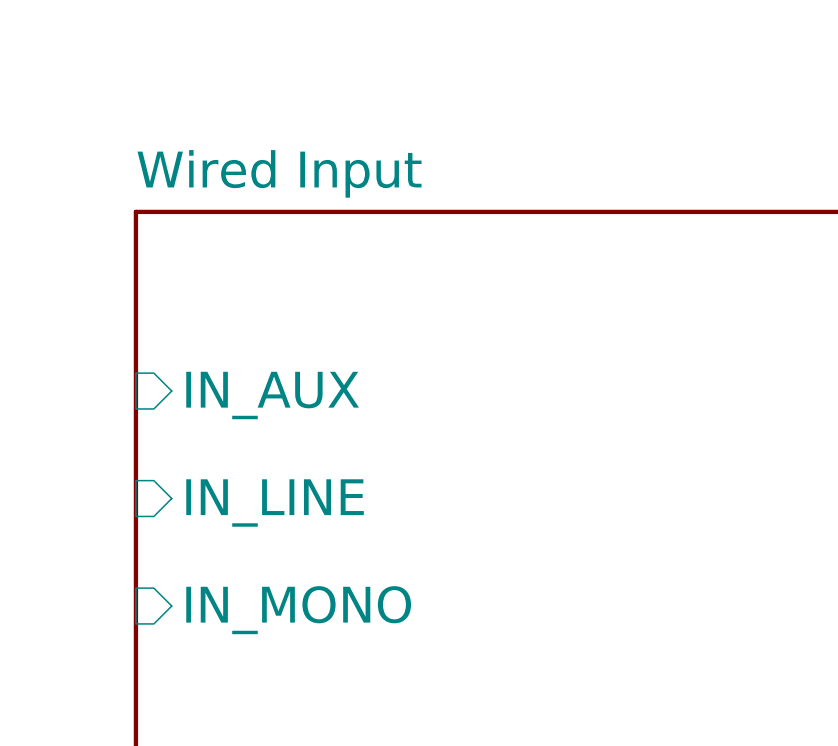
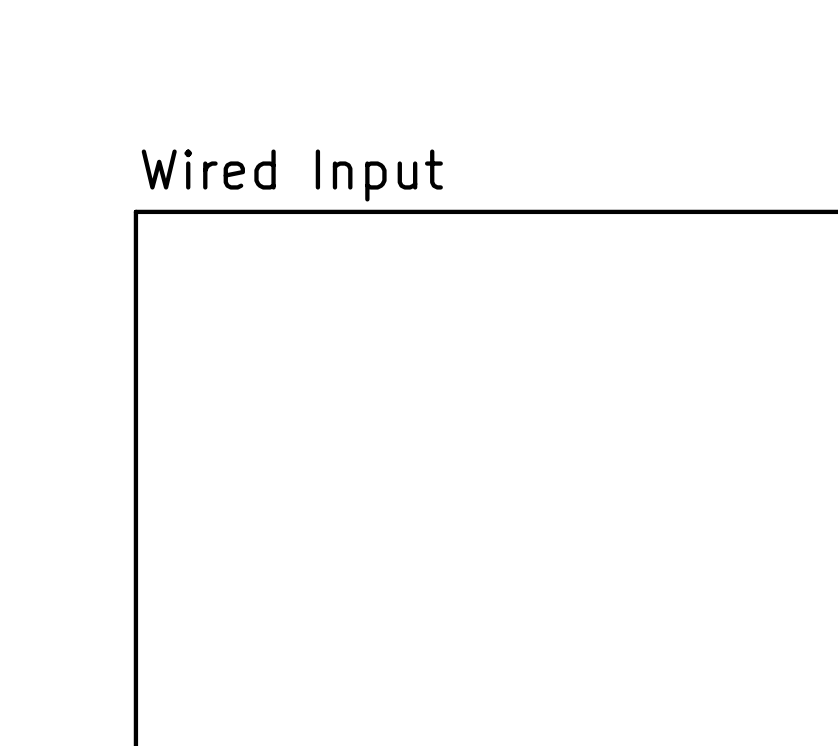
sheet pin: IN_AUX (272, 395) -> none
sheet pin: IN_LINE (275, 502) -> none
sheet pin: IN_MONO (298, 610) -> none

